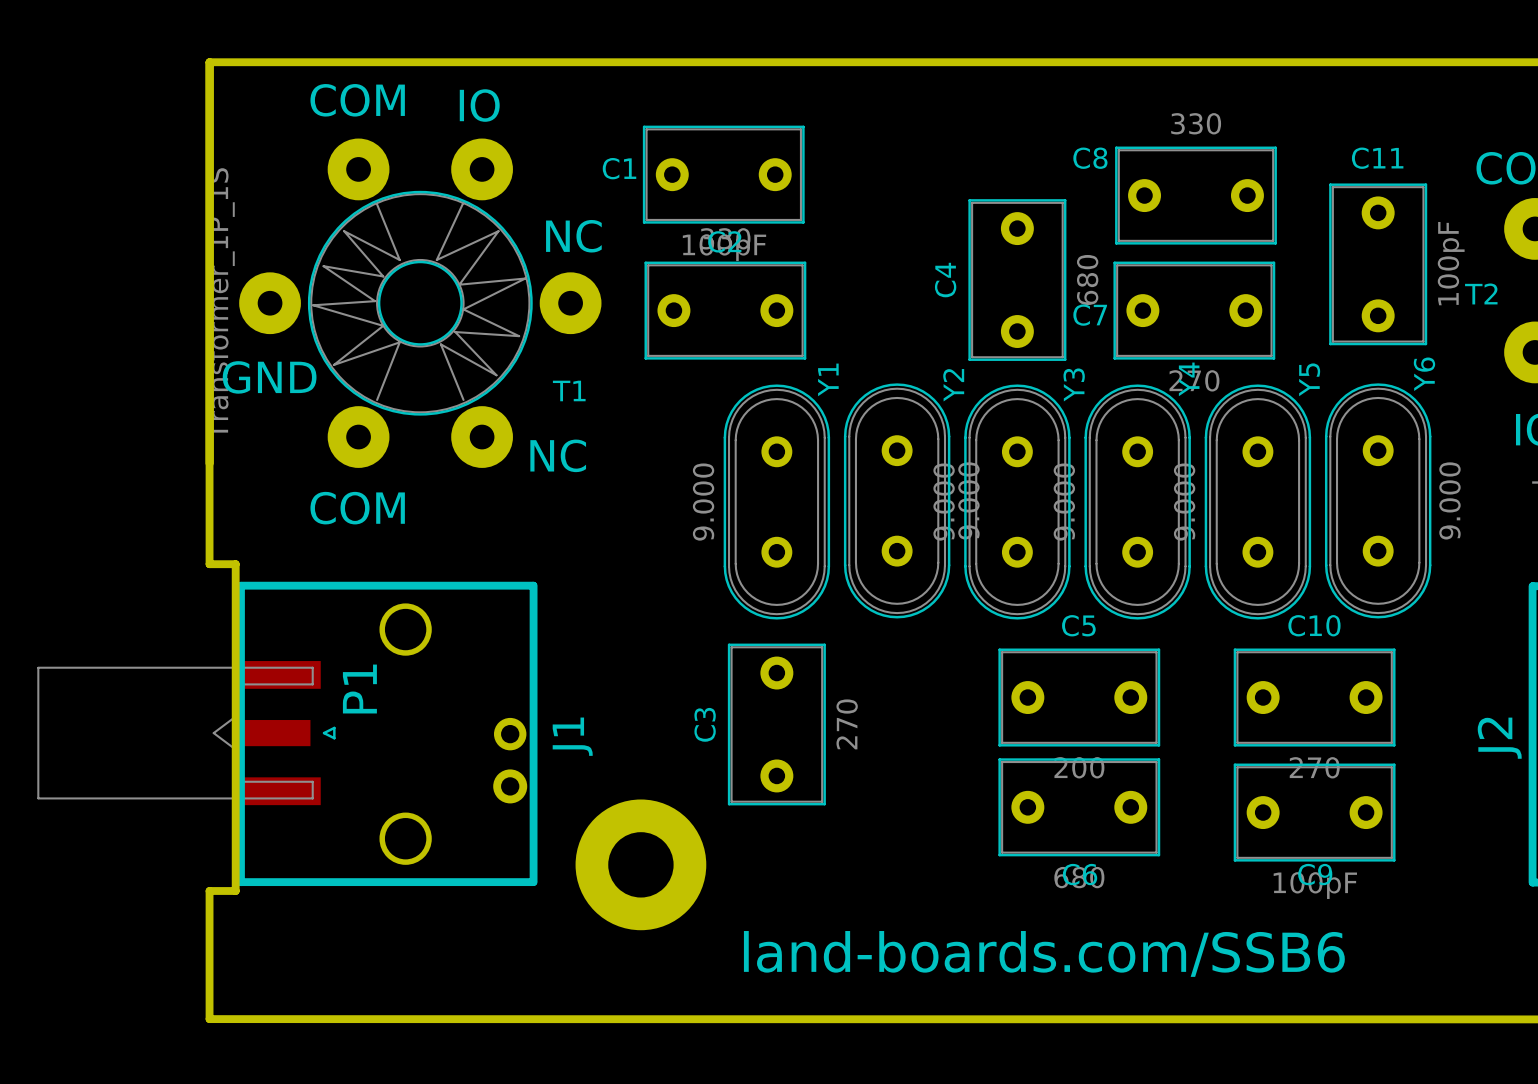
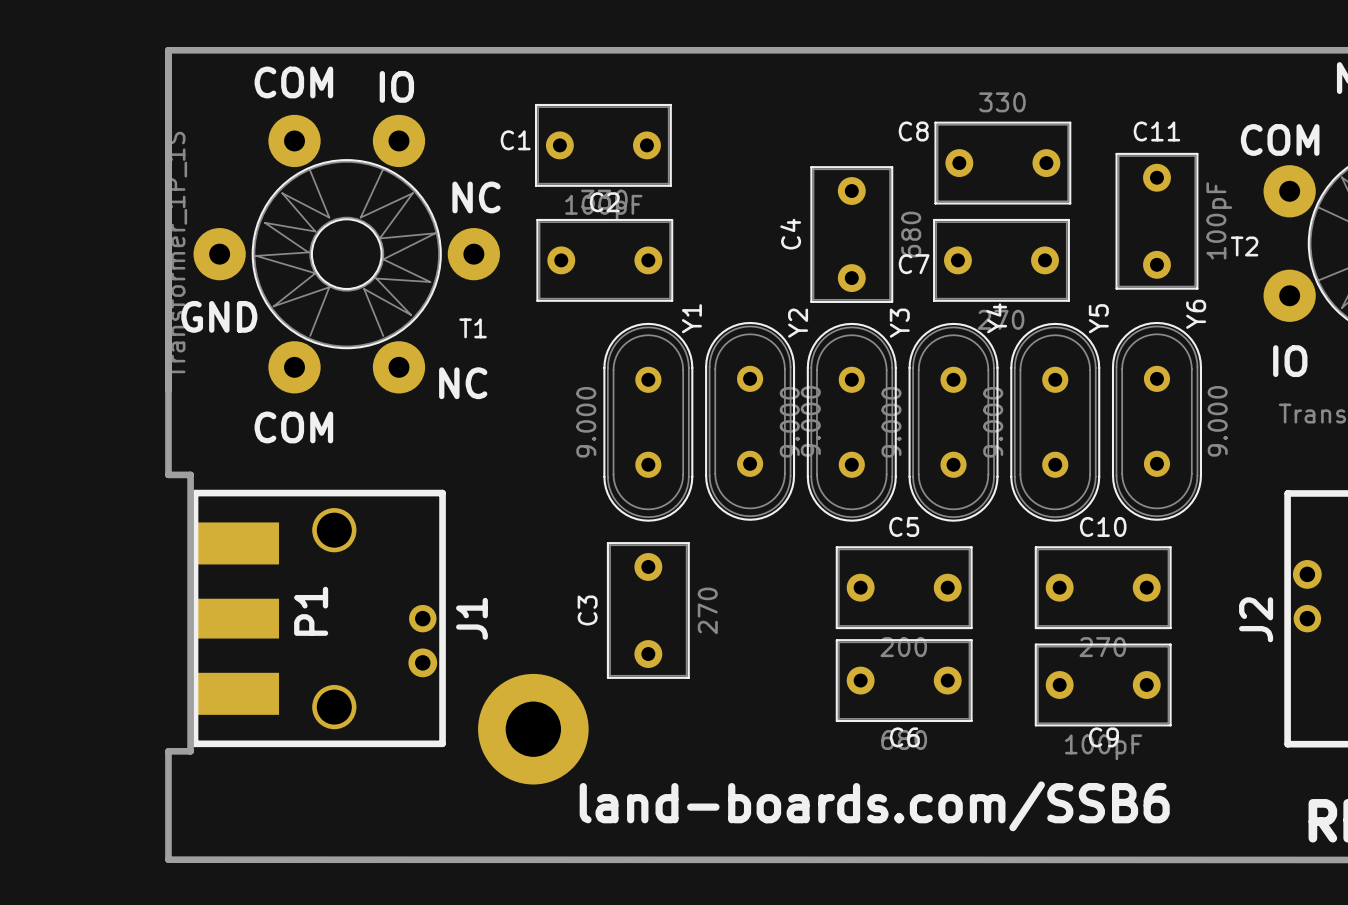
P1 footprint: [37, 661, 336, 806] -> [190, 522, 280, 715]
P1 name position: P1 (359, 689) -> P1 (311, 611)

